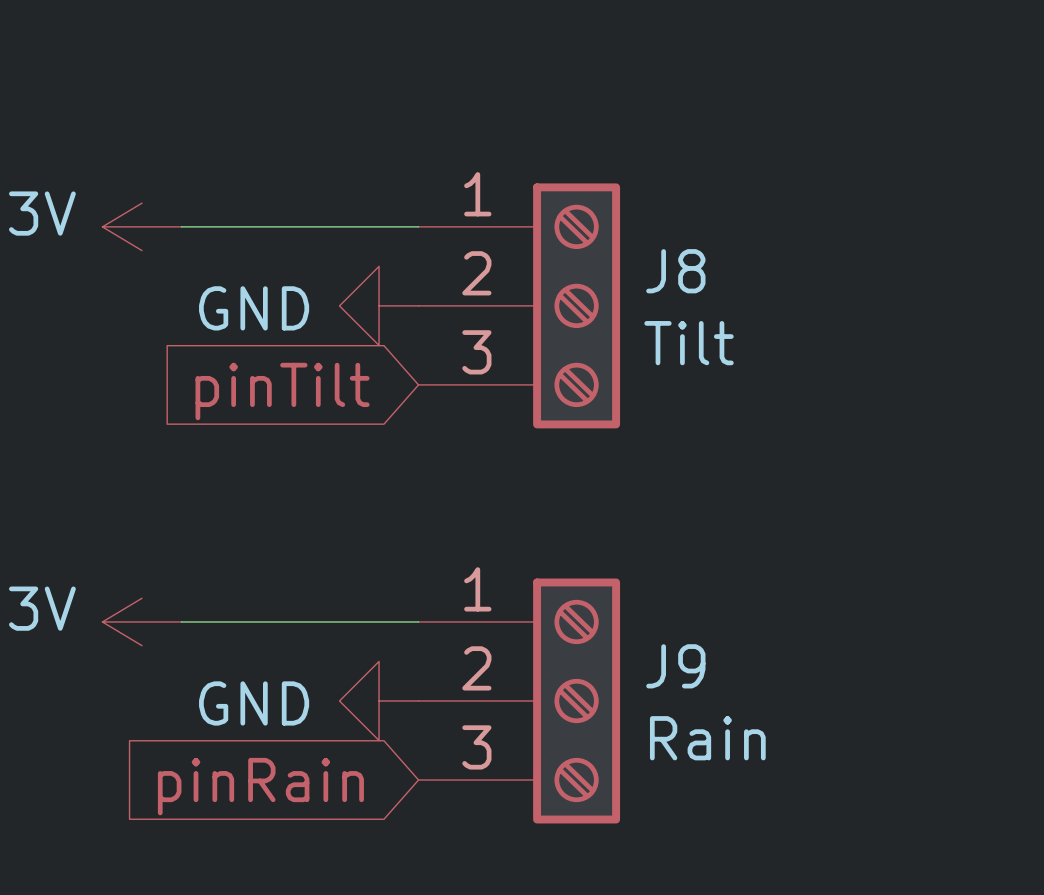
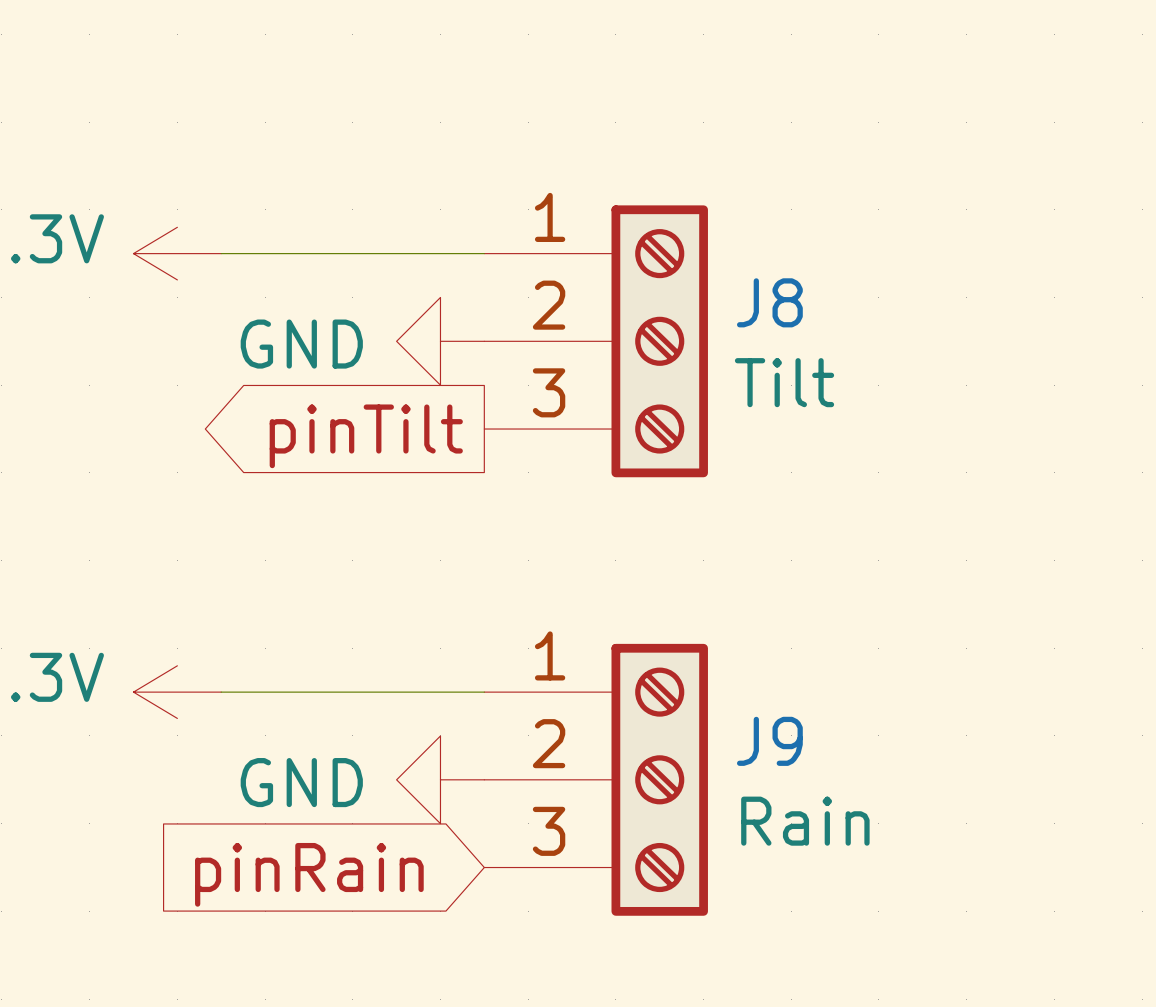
global label shape: input (282, 391) -> output (366, 436)

